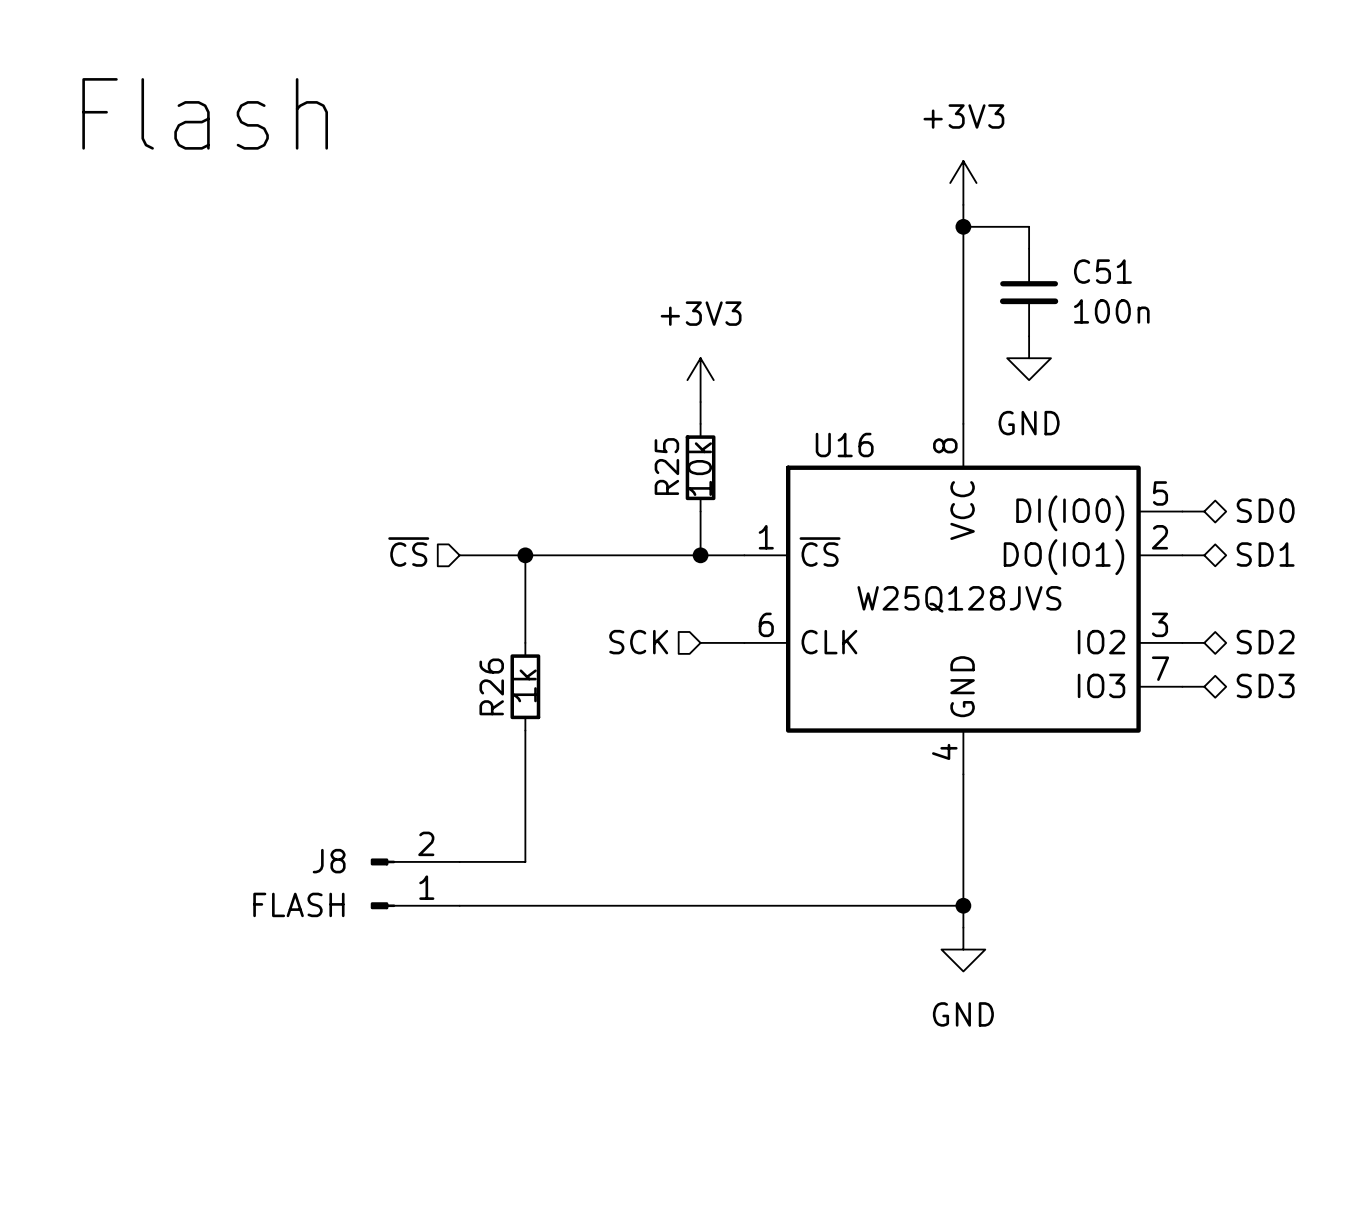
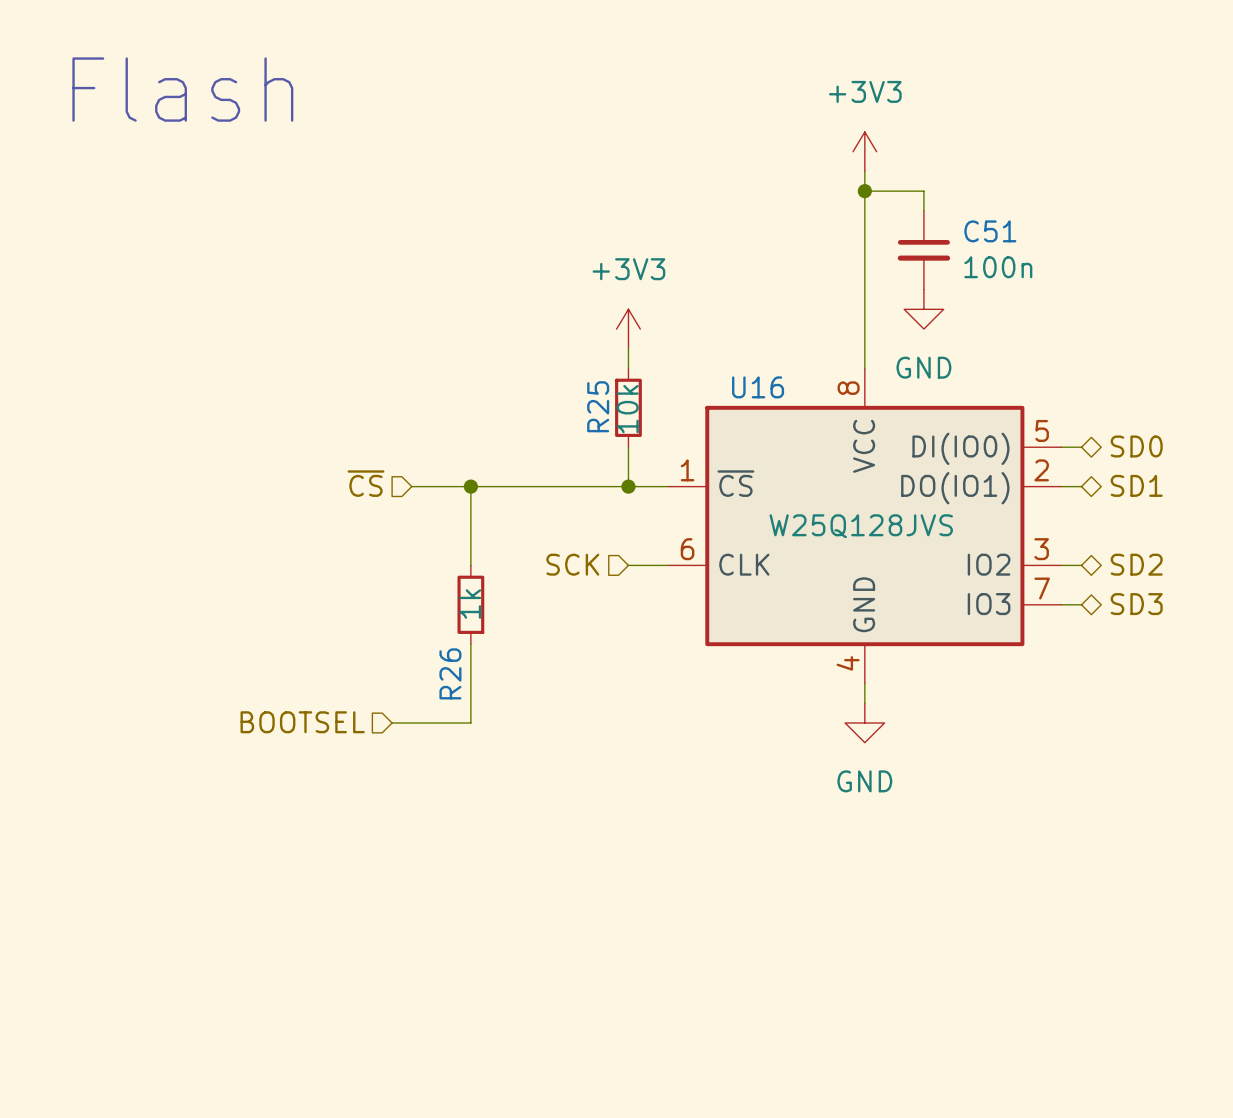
R26 name position: R26 (491, 686) -> R26 (450, 673)
wire: (963, 796) (963, 927) -> none
hierarchical label: none -> BOOTSEL (302, 722)
wire: (525, 818) (525, 861) (459, 861) -> (470, 722) (392, 722)
J8: FLASH (415, 883) -> none
wire: (459, 905) (963, 905) -> none
junction: (963, 905) -> none
power symbol position: GND (963, 949) -> GND (864, 722)

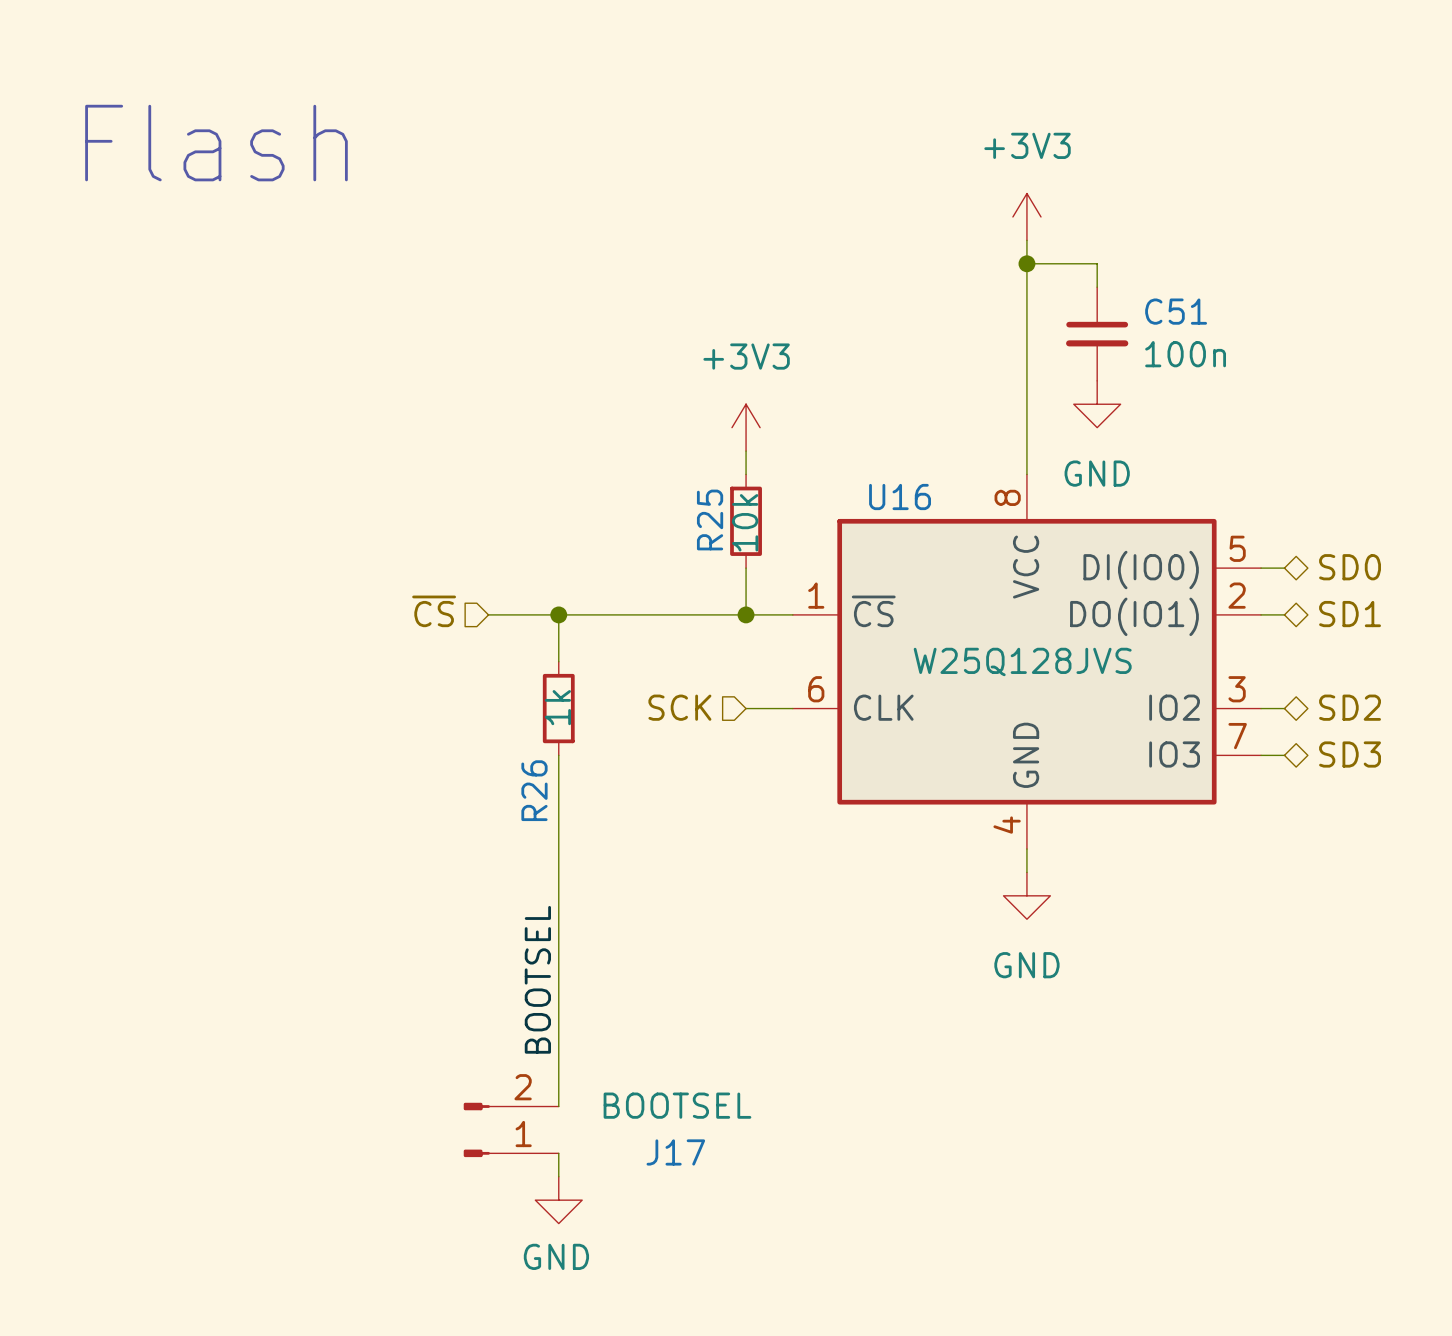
wire: (470, 526) (470, 565) -> (558, 755) (558, 802)
R26 position: (470, 604) -> (558, 708)
hierarchical label: BOOTSEL (302, 722) -> none
wire: (392, 722) (470, 722) -> (558, 1106) (558, 895)
label: none -> BOOTSEL (537, 979)
J17: none -> BOOTSEL (511, 1129)
wire: none -> (558, 1153) (558, 1176)
power symbol: none -> GND (558, 1200)

